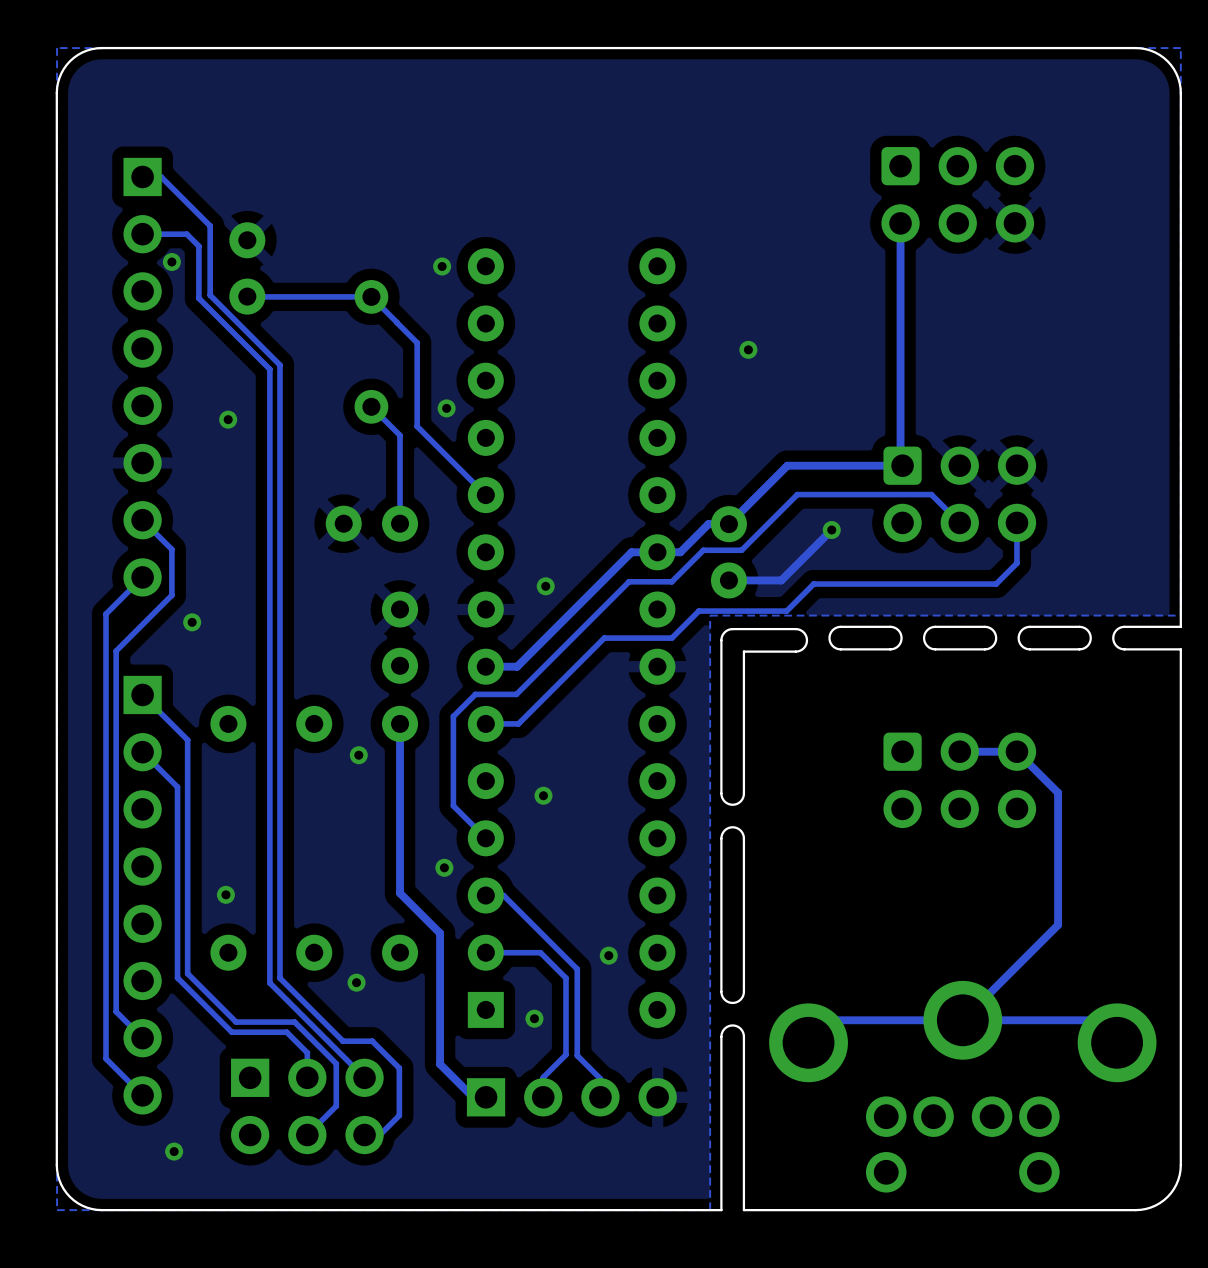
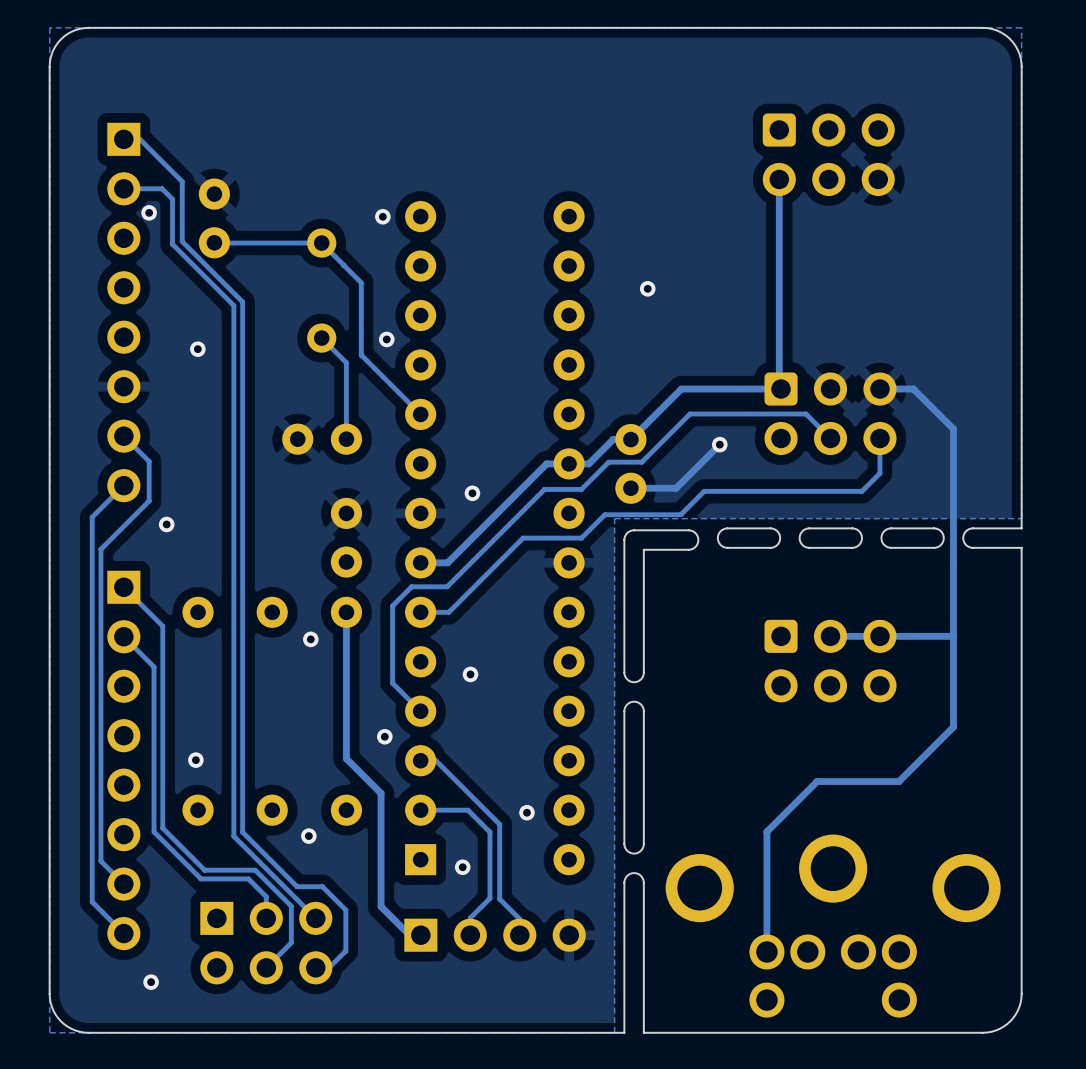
track: none -> (879, 389) (913, 389) (953, 429) (953, 727) (898, 781) (817, 781) (766, 831) (766, 947)
track: (1016, 751) (1058, 792) (1058, 925) (962, 1020) -> (879, 636) (953, 636)
track: (1117, 1042) (1094, 1020) (831, 1020) (808, 1042) -> none

